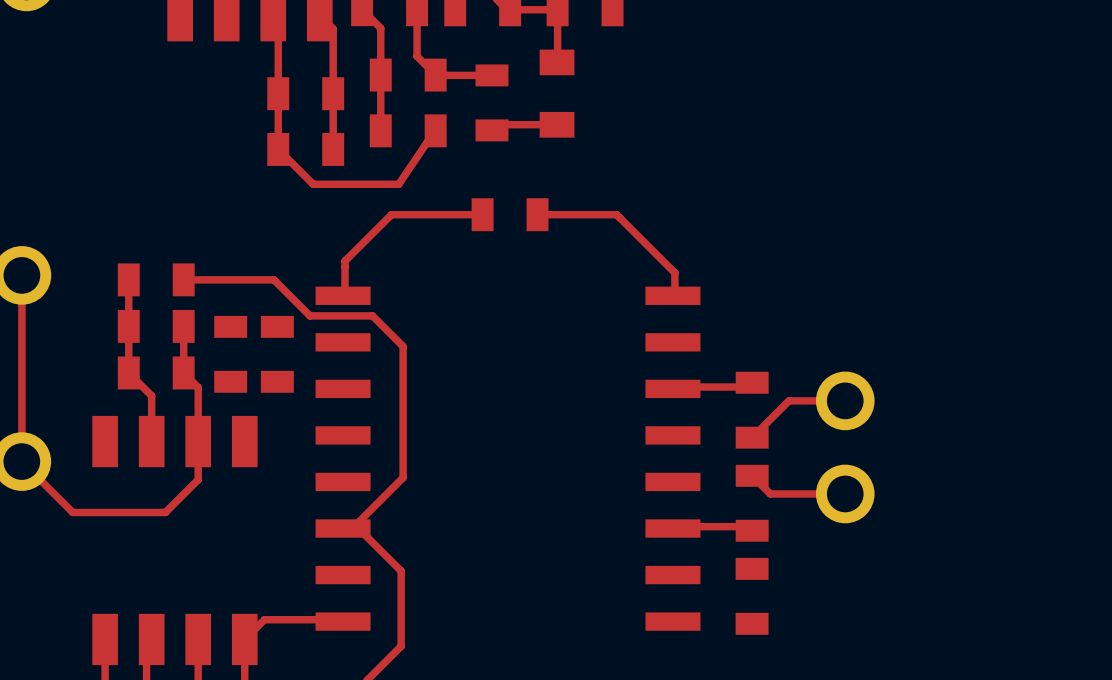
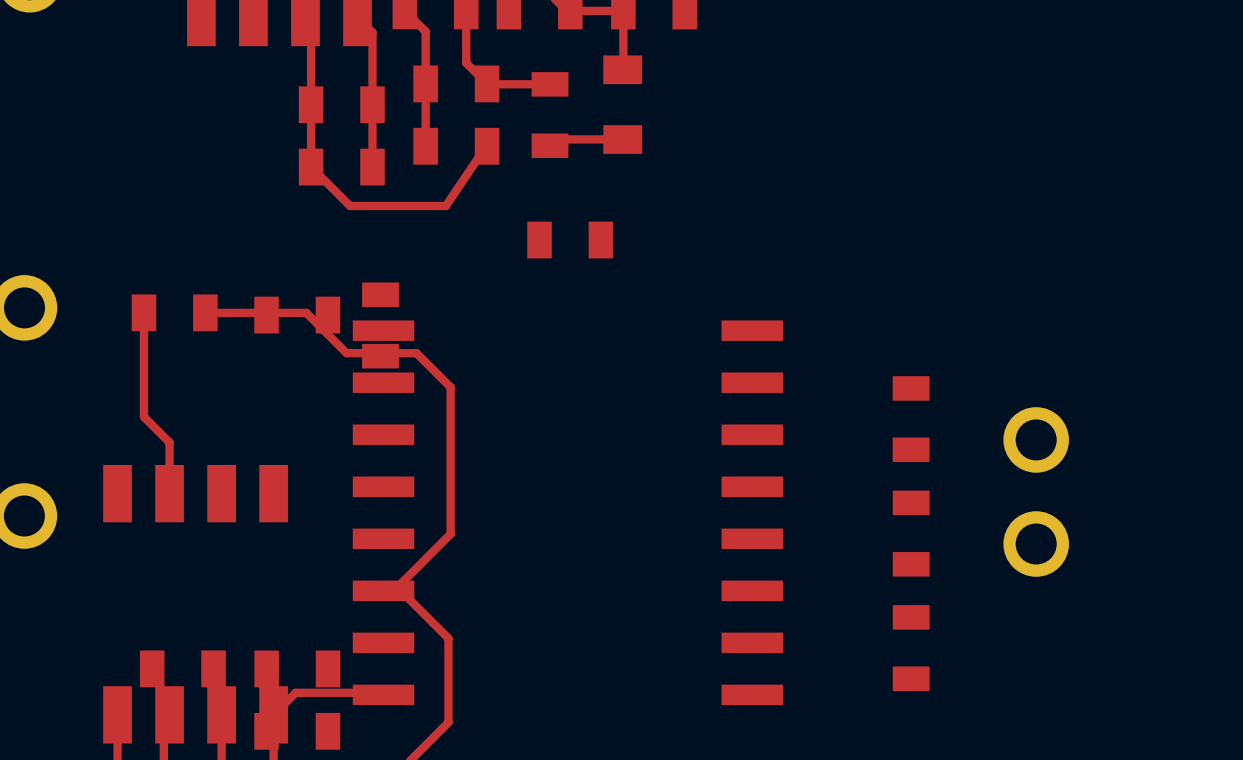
top track: (482, 214) (391, 214) (345, 261) (345, 293) -> none
top track: (537, 214) (616, 214) (674, 272) (674, 293) -> none
top track: (21, 275) (21, 461) -> none
part: none -> (297, 315)
part: none -> (380, 325)
part: (156, 326) -> none
top track: (183, 326) (183, 372) (198, 387) (198, 479) (165, 512) (72, 512) (21, 461) -> none
part: (230, 354) -> none
part: (277, 354) -> none
part: (156, 372) -> none
part: none -> (911, 419)
top track: (752, 382) (747, 387) (674, 387) -> none
top track: (845, 400) (788, 400) (752, 437) -> none
part: (752, 410) -> none
part position: (845, 447) -> (1036, 491)
top track: (752, 475) (770, 493) (845, 493) -> none
part: none -> (911, 533)
part: (752, 503) -> none
top track: (674, 526) (748, 526) (752, 530) -> none
part: none -> (911, 648)
part: (752, 596) -> none
part: none -> (182, 668)
part: none -> (297, 668)
part: none -> (297, 731)

